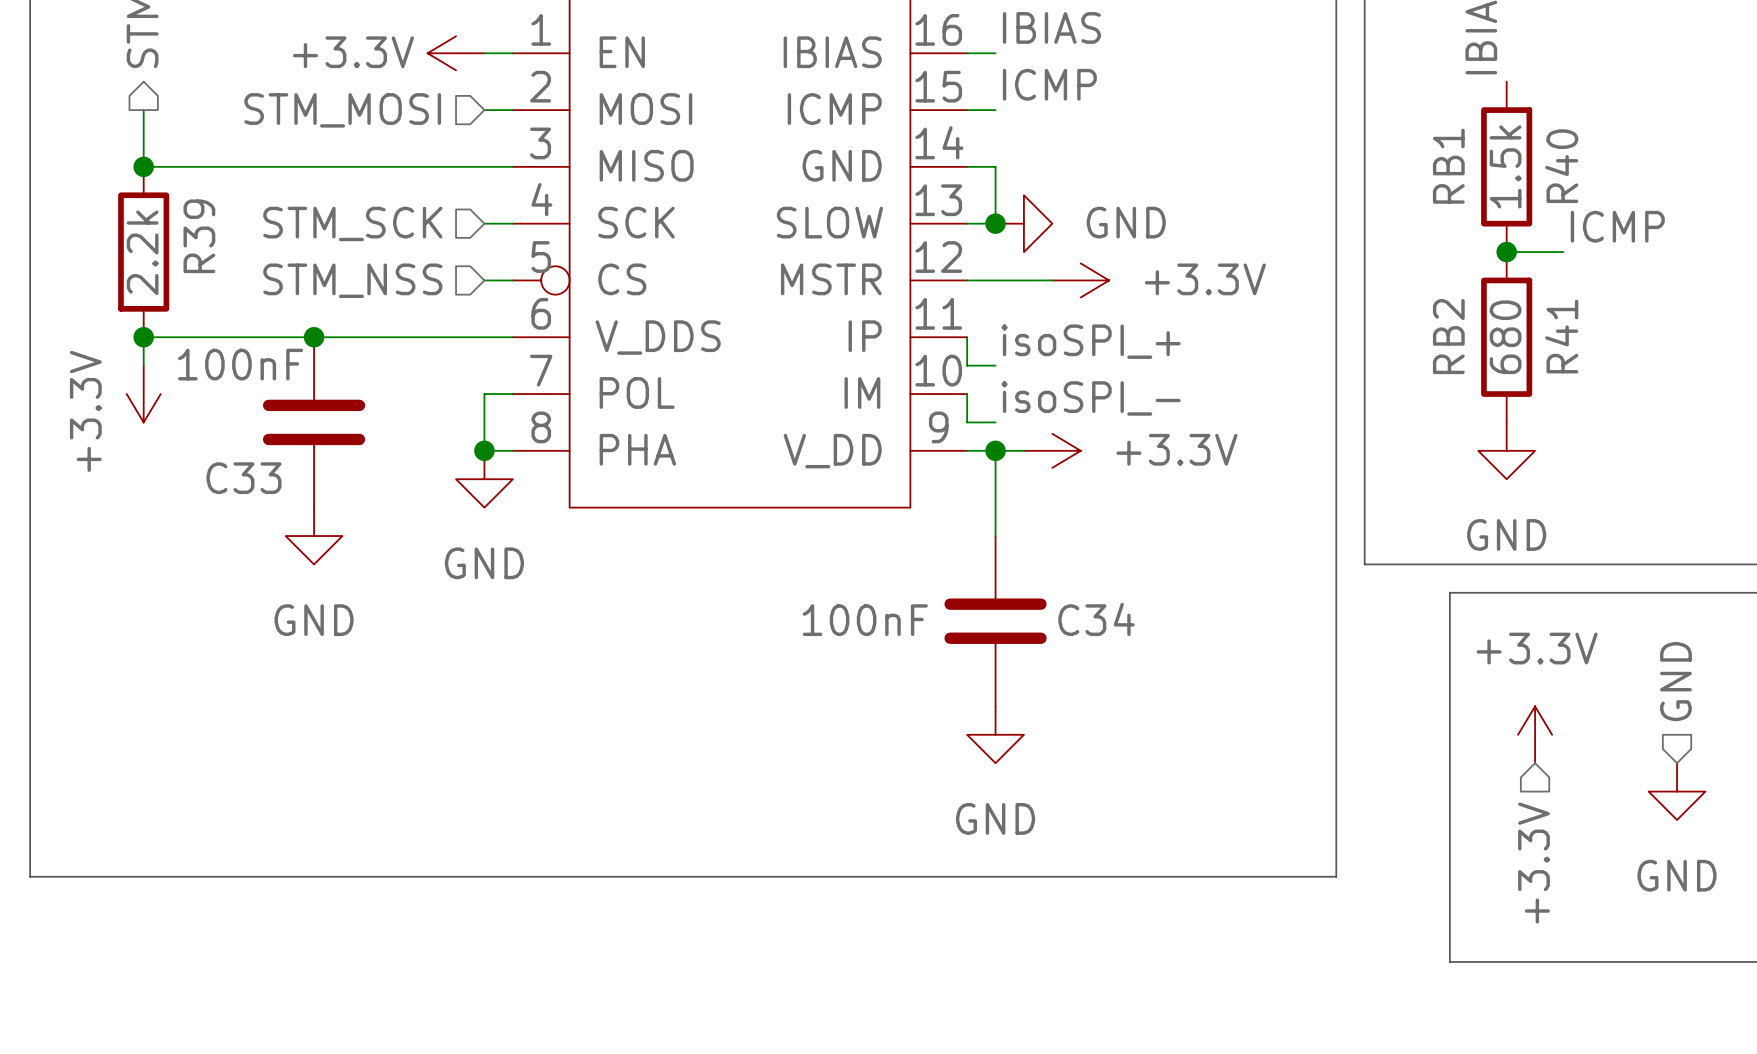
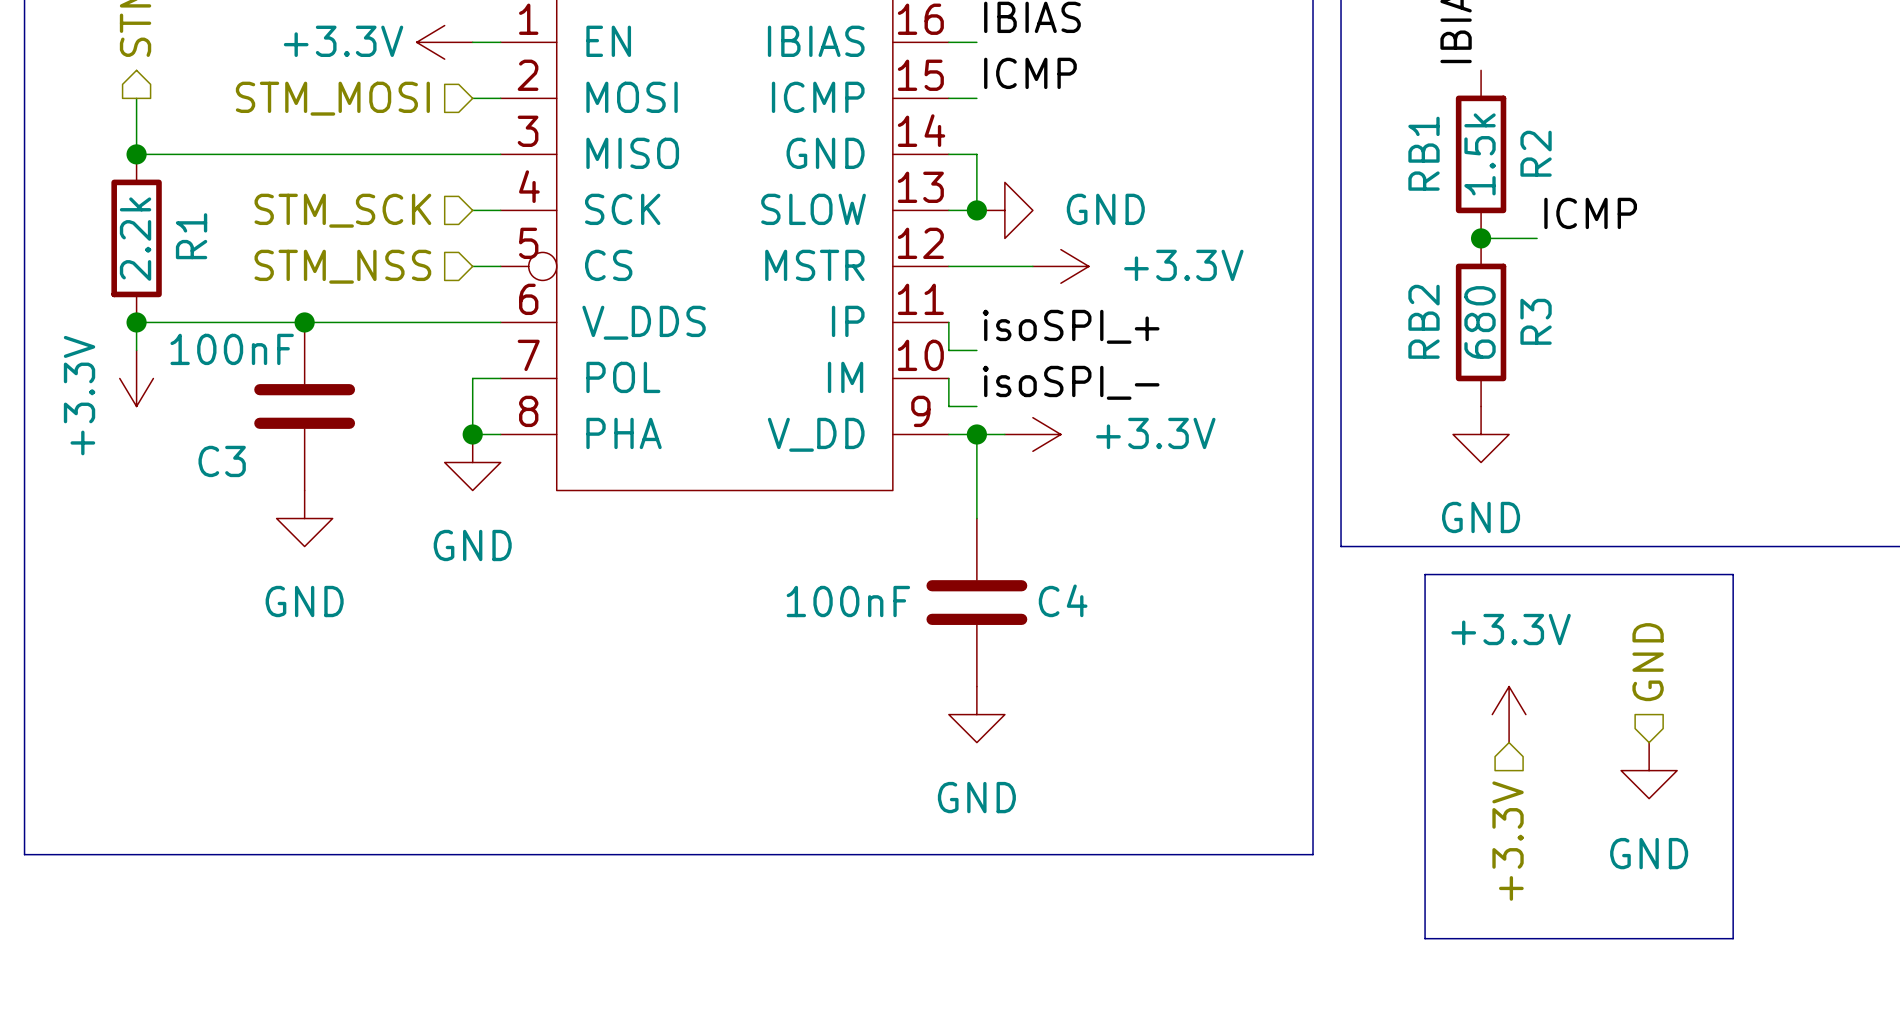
R40 name: R40 (1561, 166) -> R2 (1536, 153)
R39 name: R39 (199, 236) -> R1 (191, 236)
R41 name: R41 (1561, 336) -> R3 (1536, 321)
C33 name: C33 (243, 478) -> C3 (222, 461)
C34 name: C34 (1096, 619) -> C4 (1063, 600)

